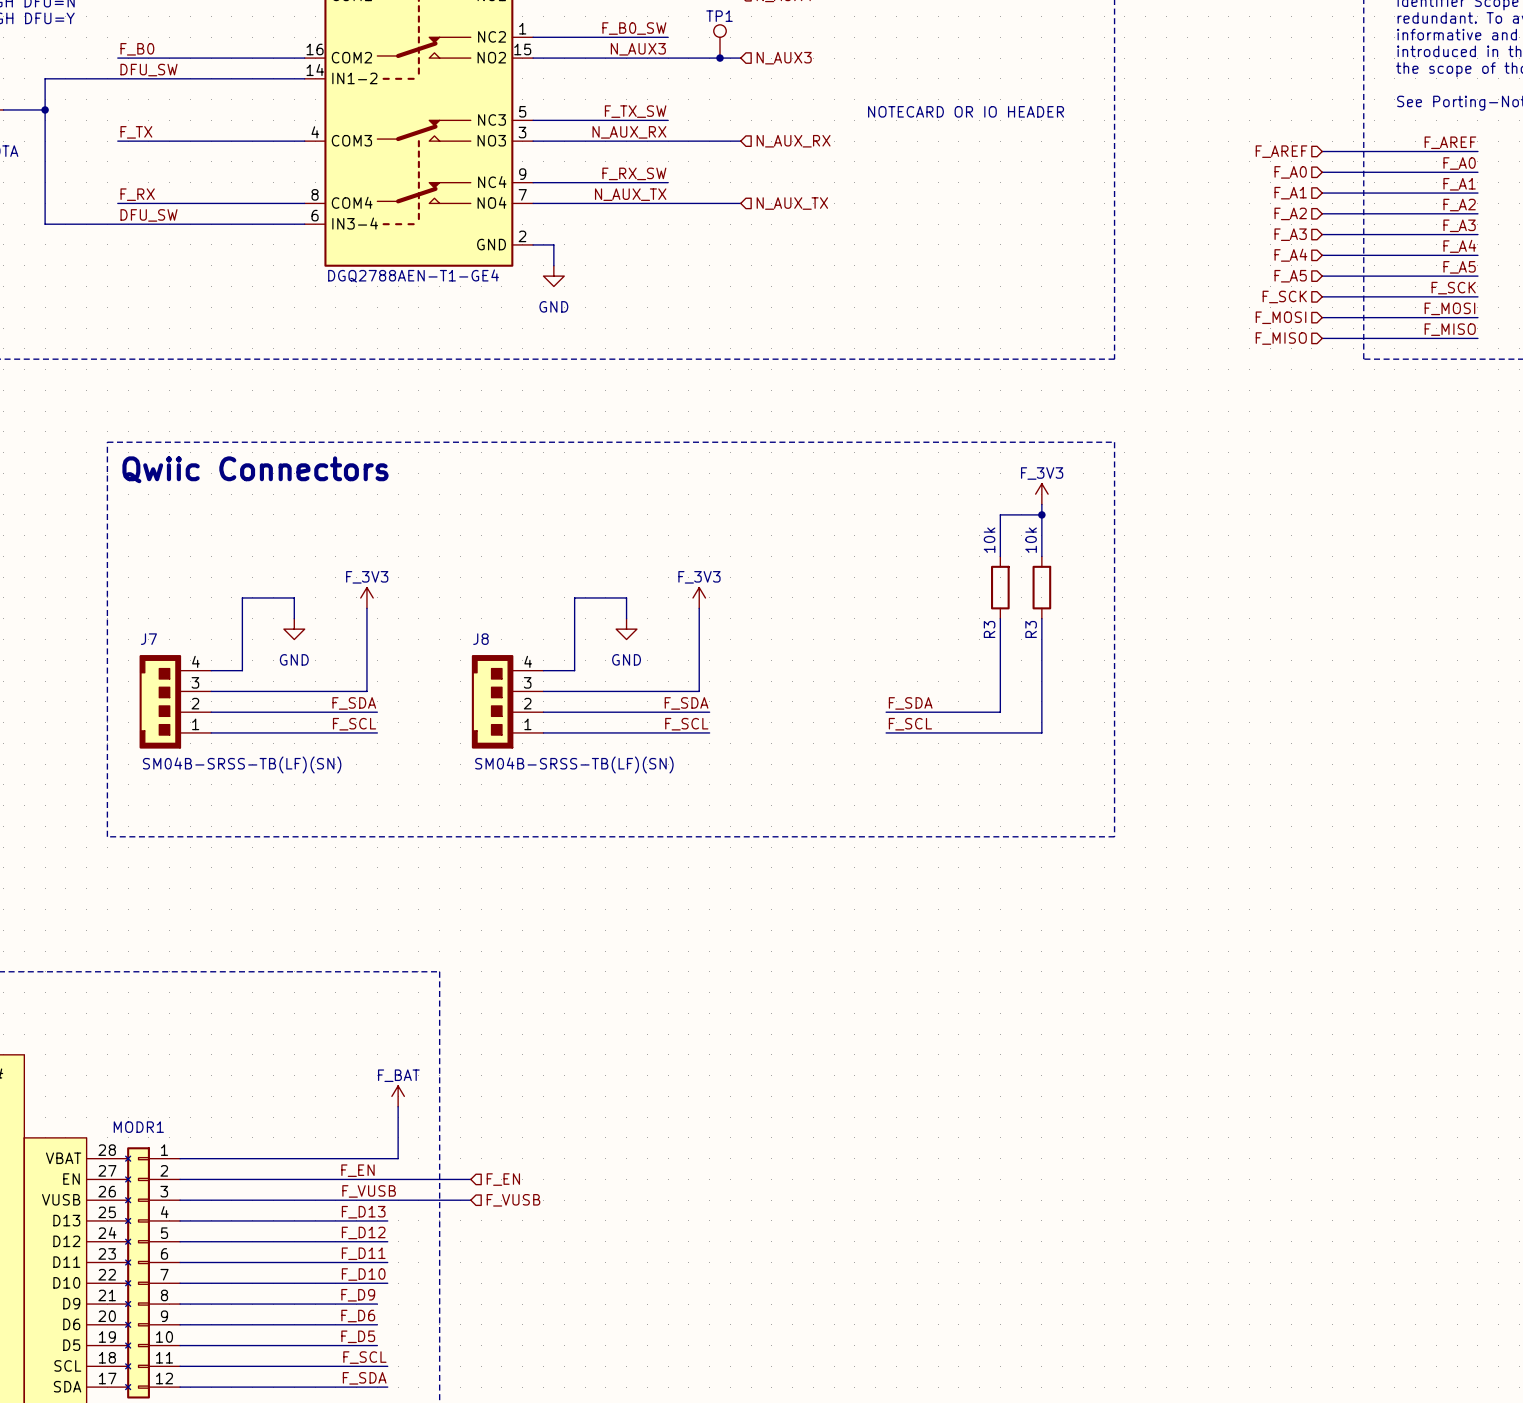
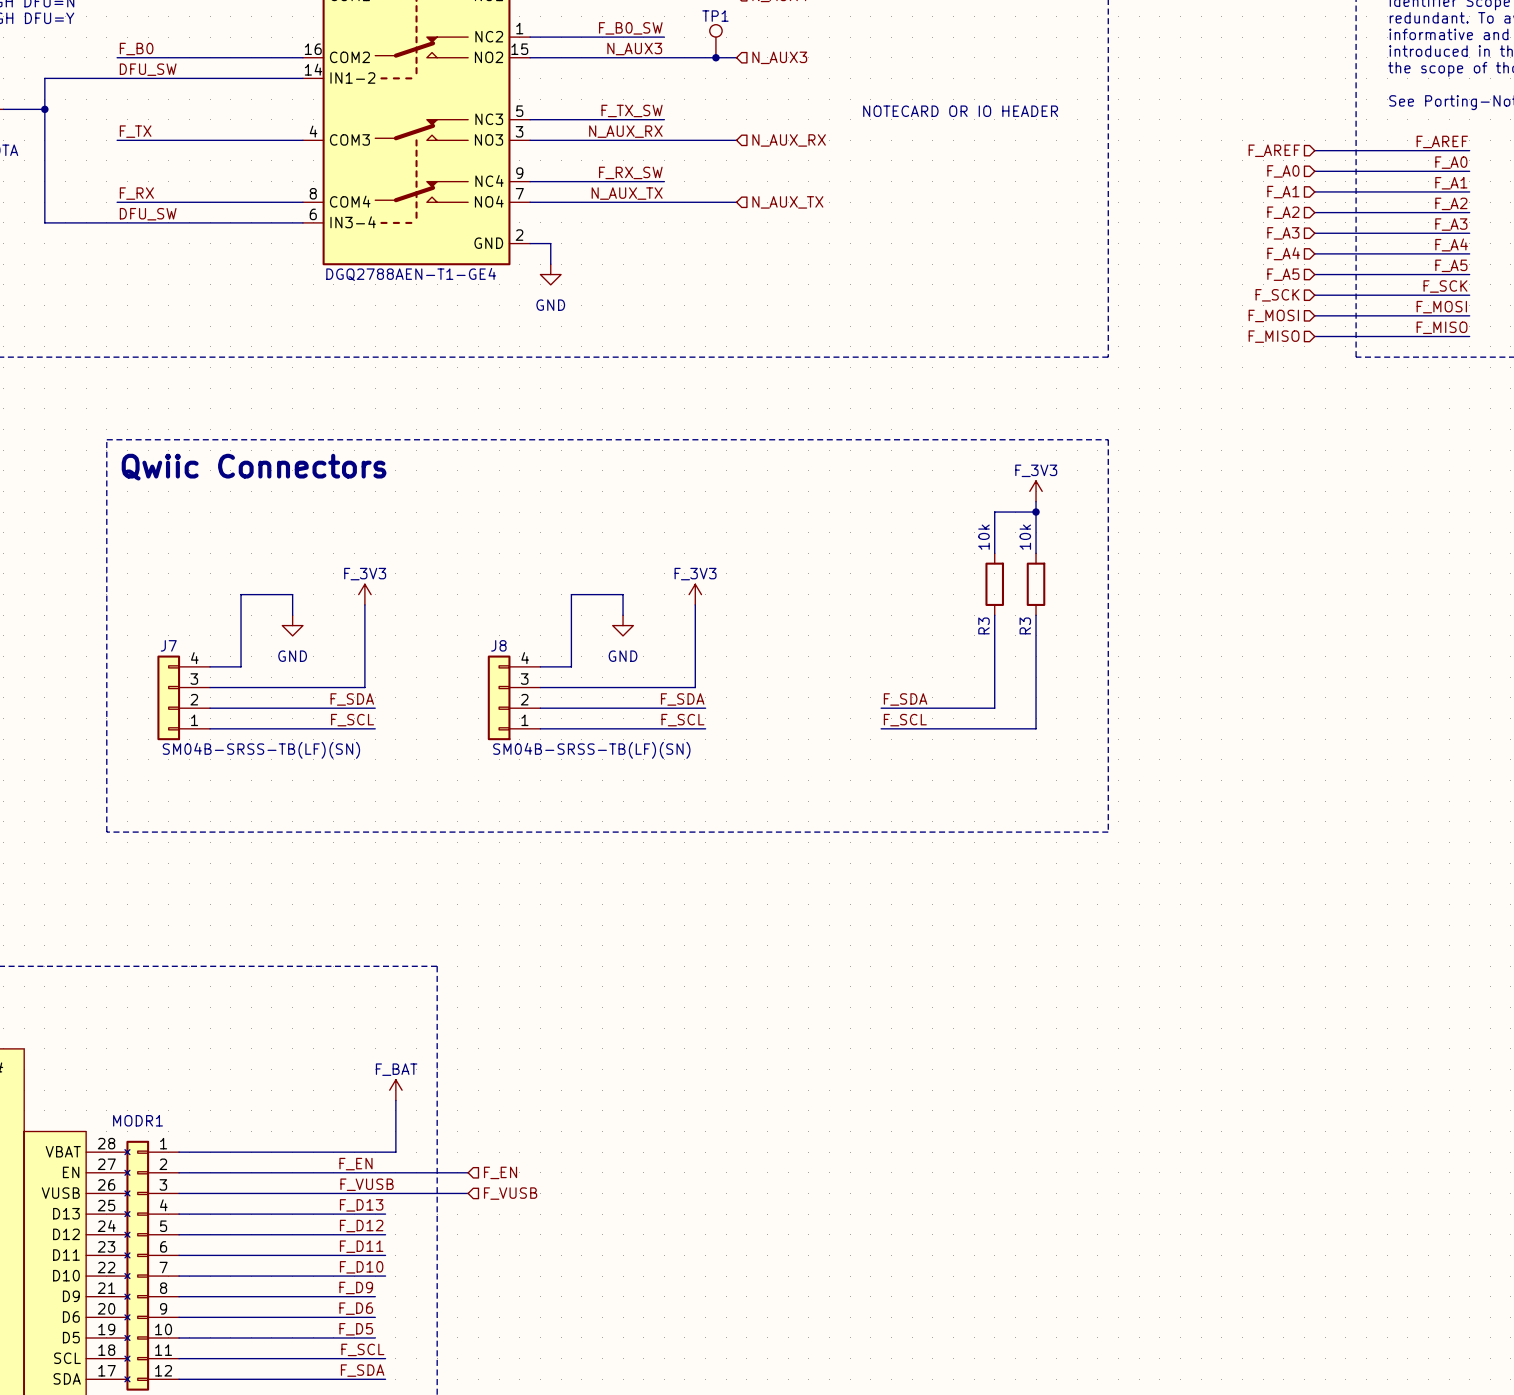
J7 symbol: [139, 655, 212, 749] -> [157, 655, 211, 741]
J8 symbol: [471, 655, 544, 749] -> [487, 655, 541, 741]

